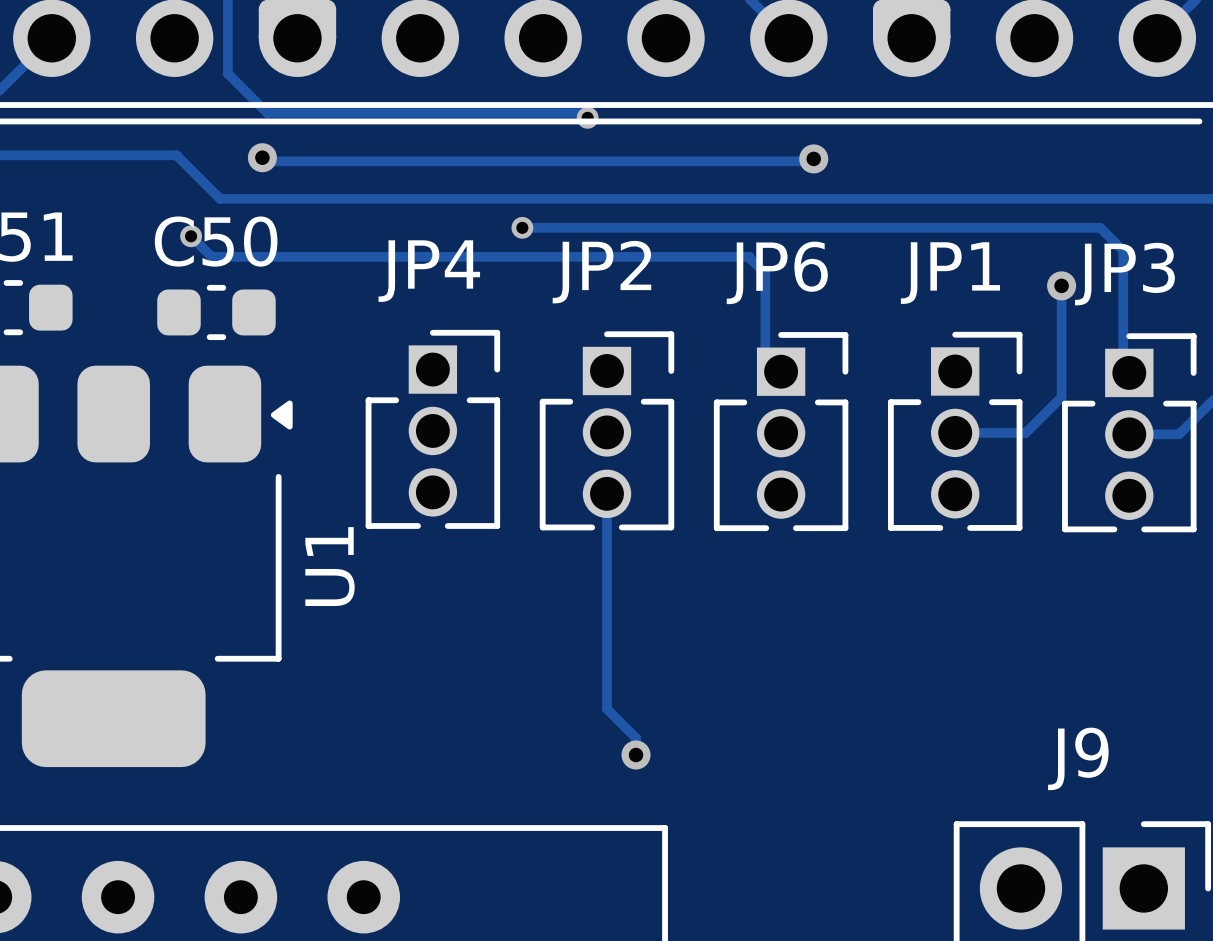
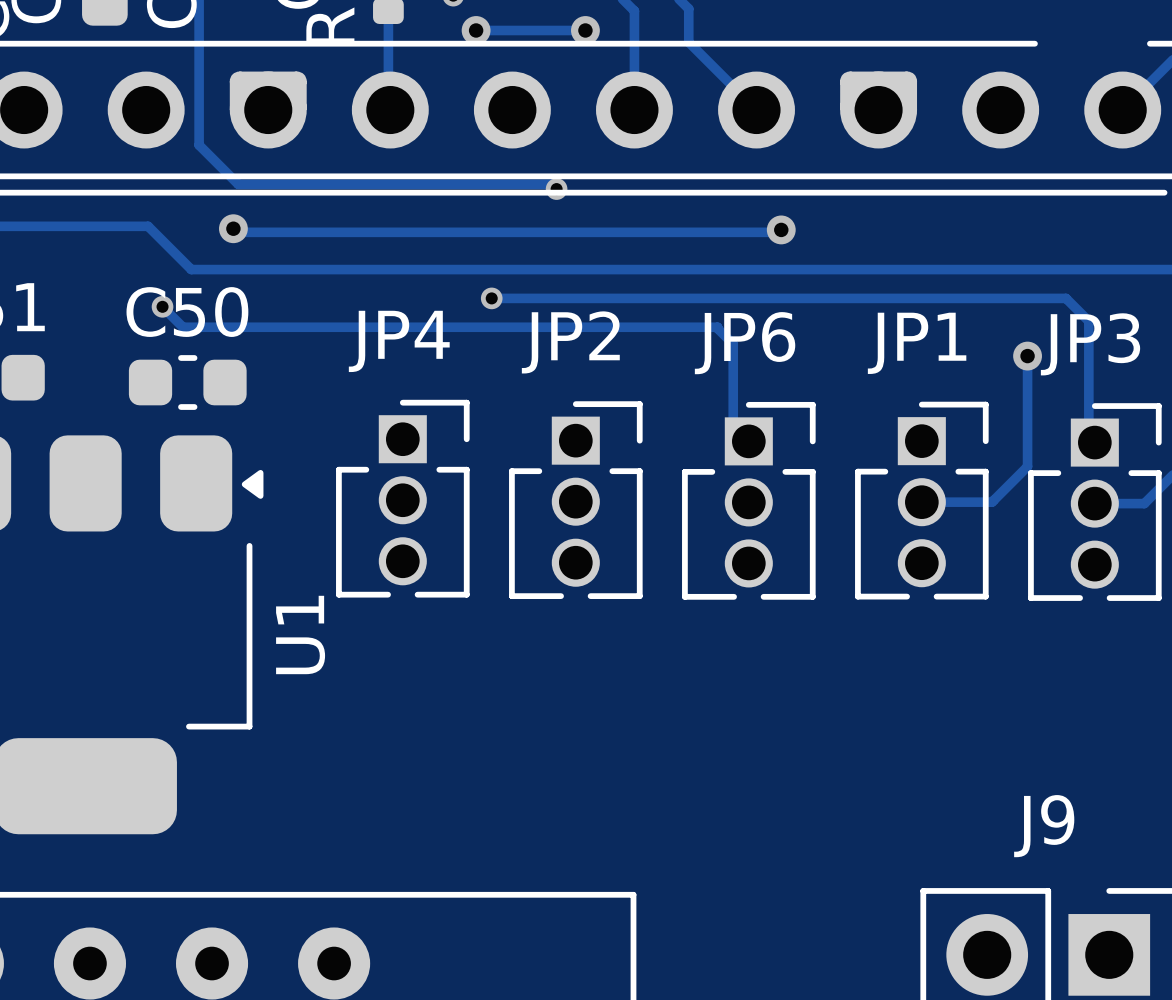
track: (606, 493) (606, 709) (636, 738) (636, 754) -> none
via: (636, 754) -> none

